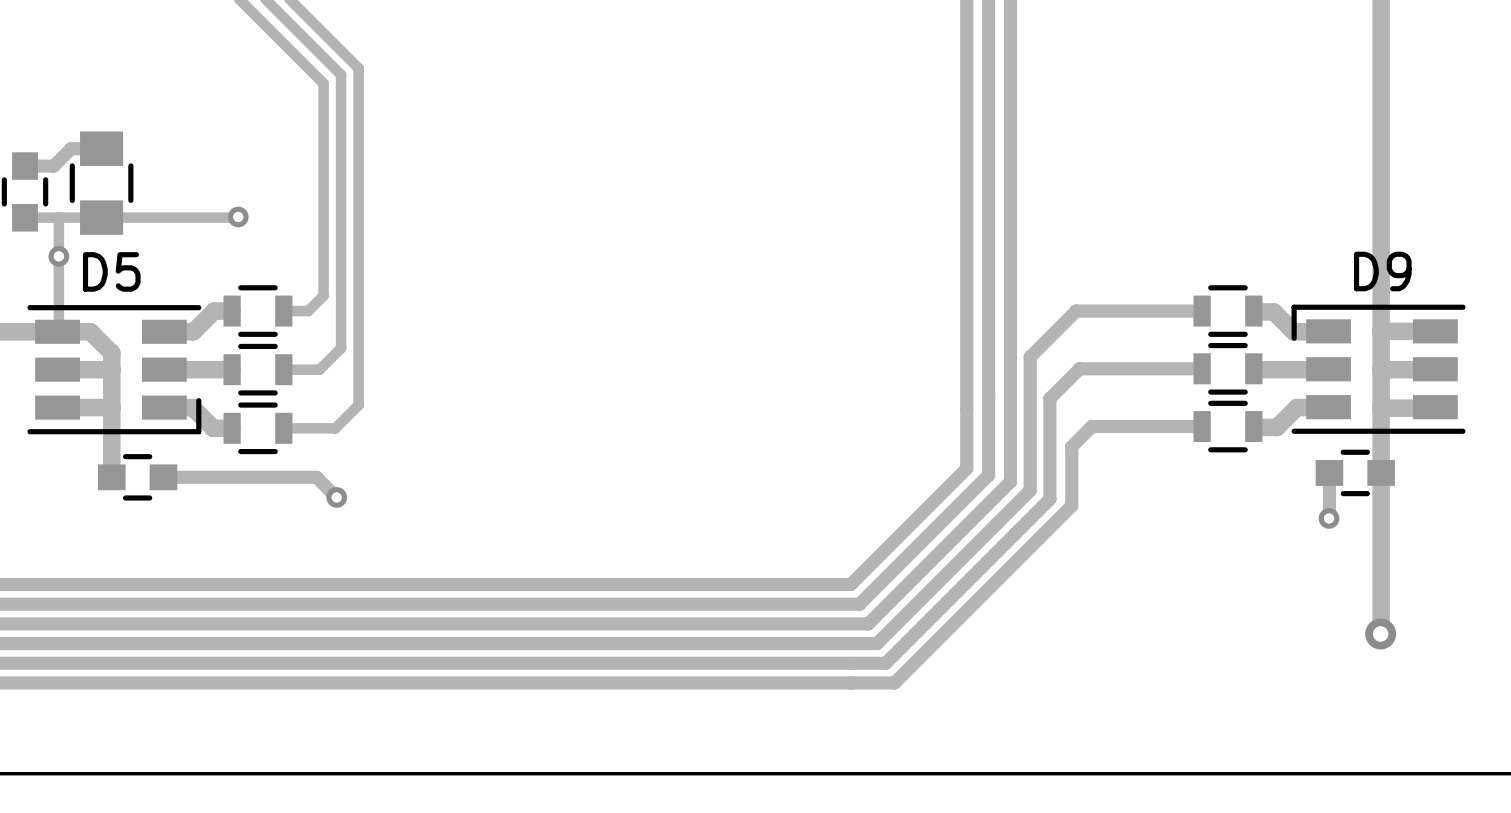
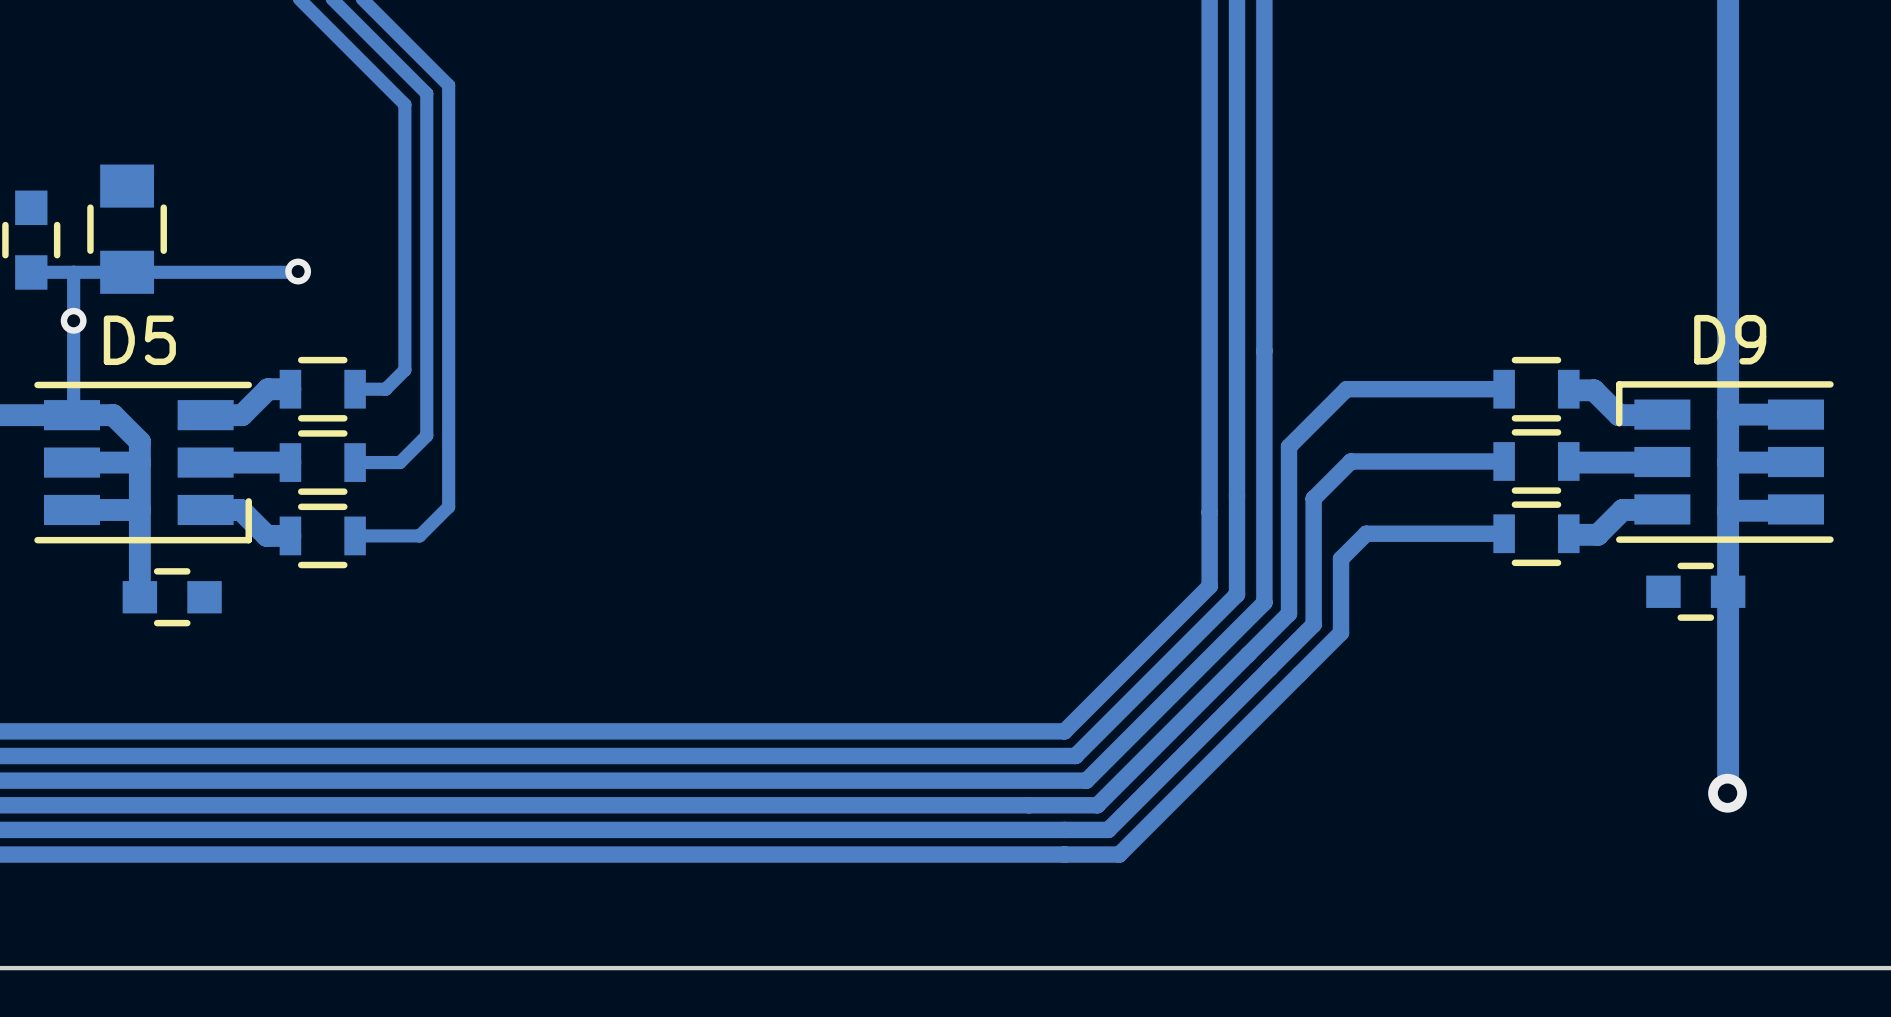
track: (101, 148) (71, 148) (53, 166) (25, 166) -> none
track: (1329, 472) (1329, 518) -> none
track: (163, 477) (316, 477) (336, 497) -> none
via: (336, 497) -> none
via: (1329, 518) -> none

